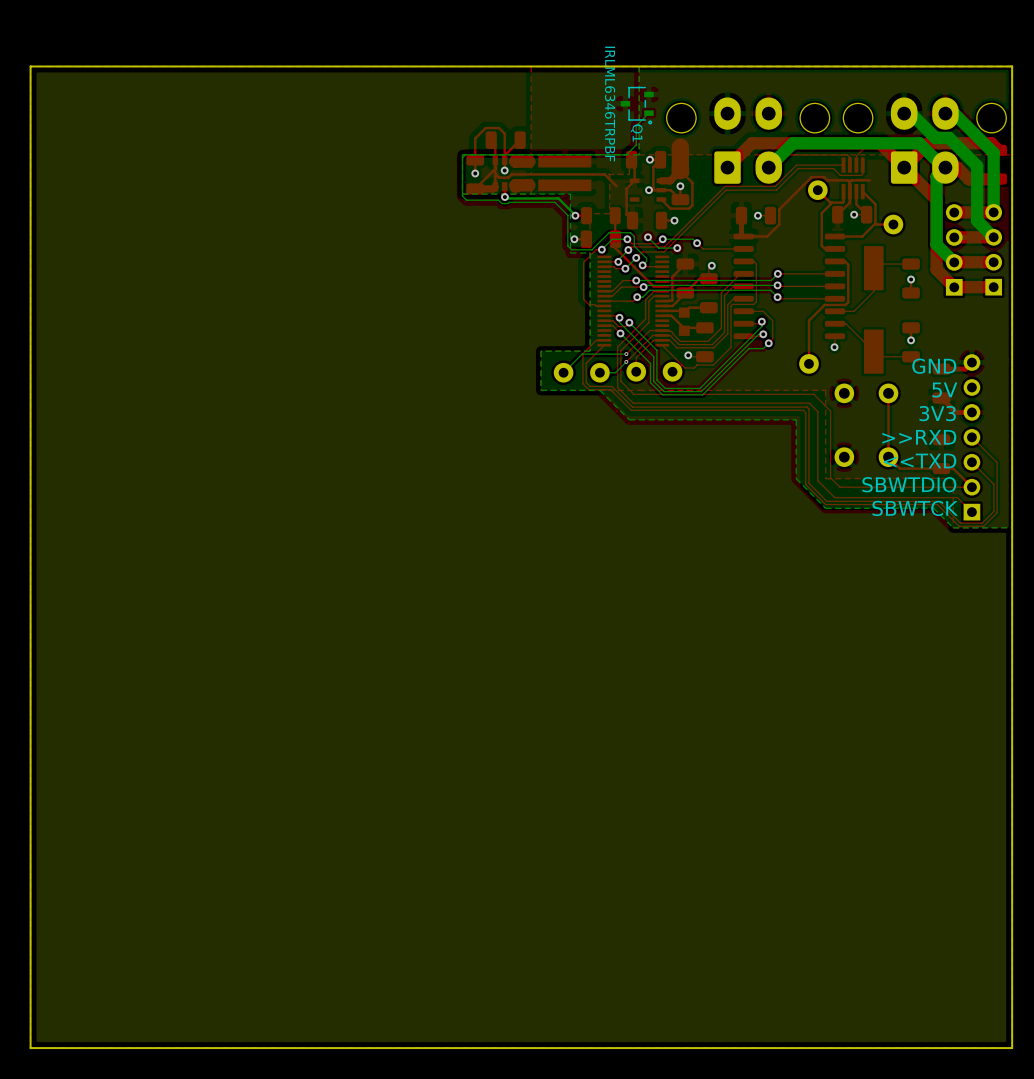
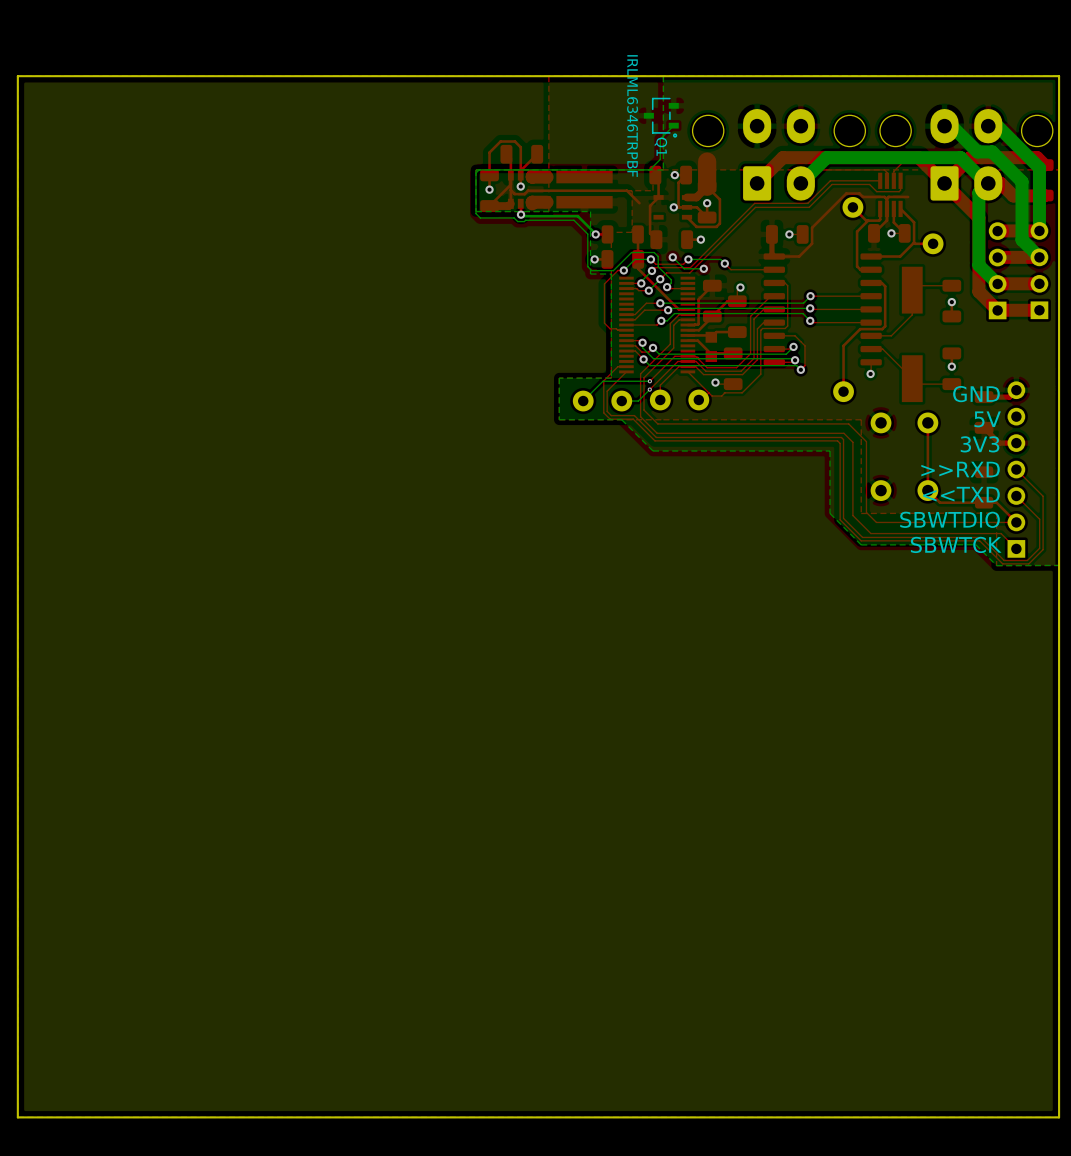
bottom track: (761, 321) (761, 326) (699, 388) (665, 388) (656, 380) (656, 350) (635, 328) -> (793, 346) (786, 354) (659, 354)
bottom track: (629, 332) (653, 356) (653, 381) (664, 391) (701, 391) (758, 334) (763, 334) -> (653, 358) (793, 358)
bottom track: (626, 339) (650, 363) (650, 382) (662, 394) (702, 394) (749, 348) (763, 348) (768, 343) -> (649, 365) (796, 365) (800, 369)

